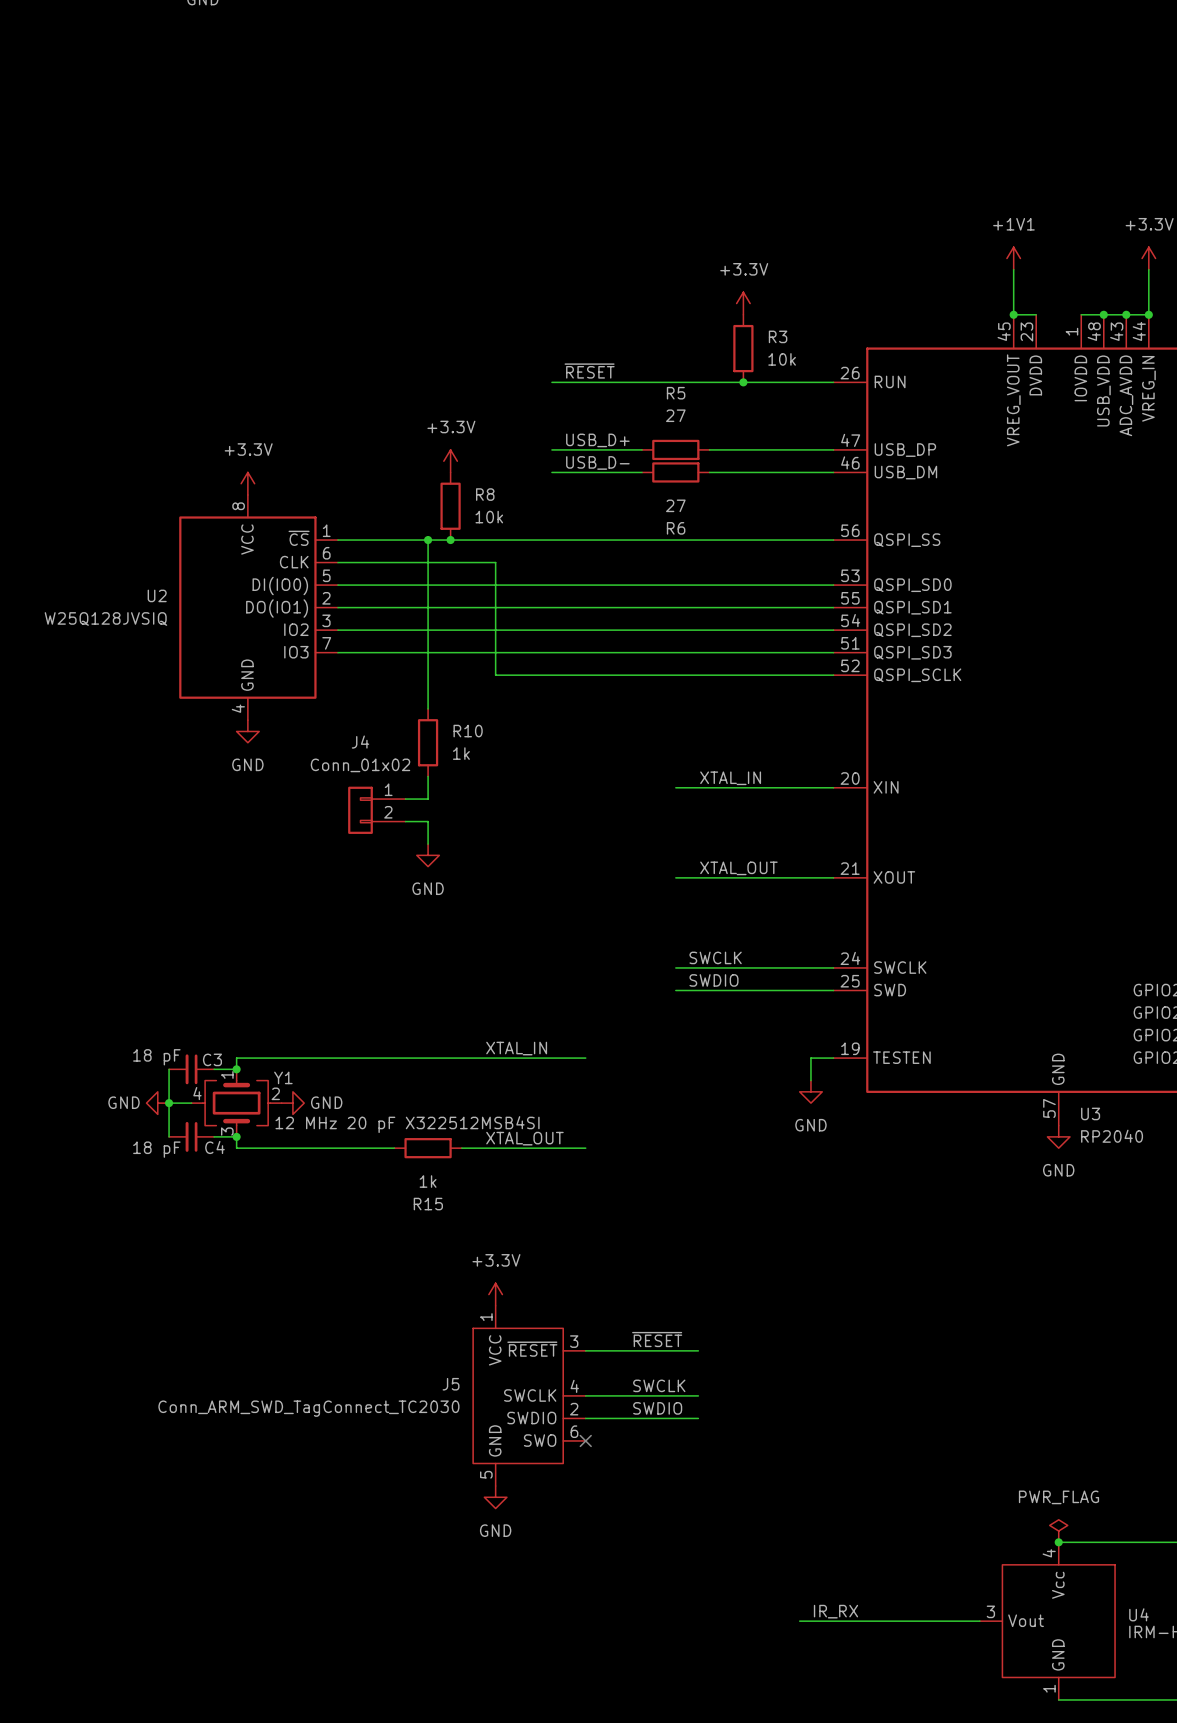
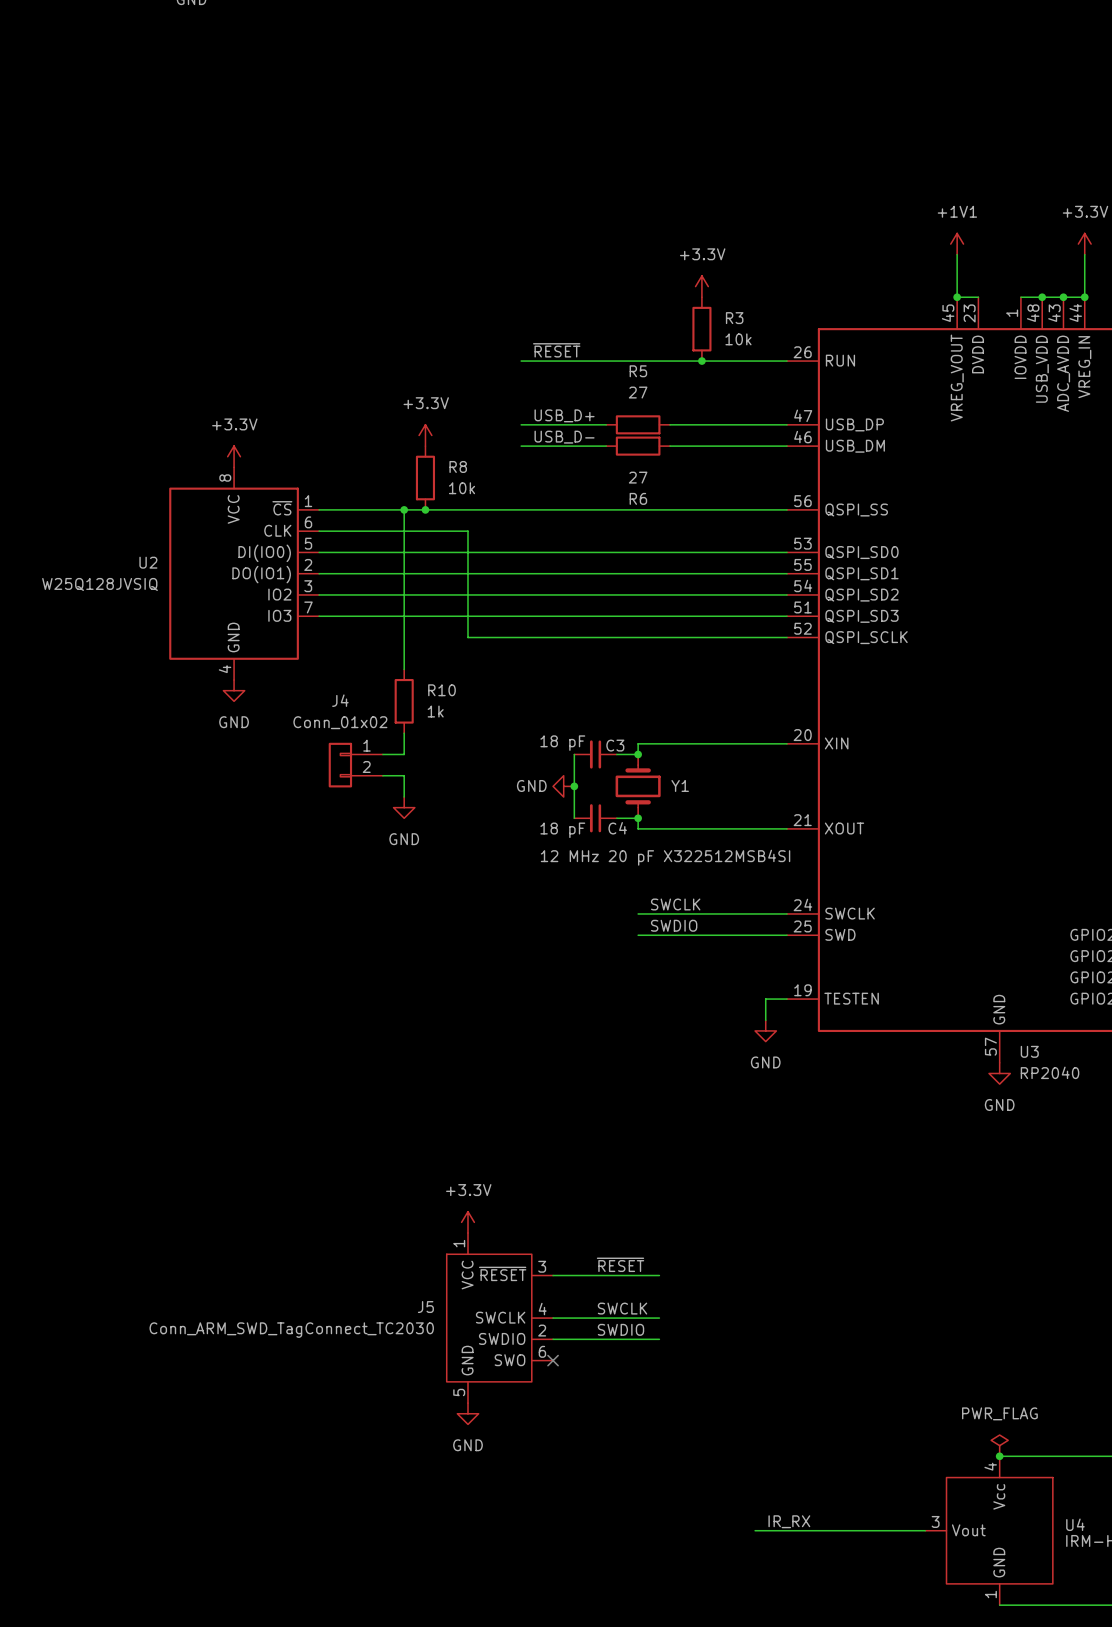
label: XTAL_IN (730, 778) -> none
wire: none -> (638, 743) (638, 754) (616, 754)
wire: none -> (574, 754) (574, 818)
junction: none -> (638, 754)
power symbol: none -> GND (563, 786)
junction: none -> (574, 786)
wire: none -> (616, 818) (638, 818) (638, 828)
junction: none -> (638, 818)
label: XTAL_OUT (738, 868) -> none
label: XTAL_IN (516, 1048) -> none
wire: (585, 1058) (236, 1058) (236, 1069) (214, 1069) -> none
wire: (169, 1069) (169, 1136) -> none
Y1 symbol: [191, 1069, 282, 1137] -> [615, 754, 661, 819]
C3 position: (191, 1069) -> (595, 754)
junction: (236, 1069) -> none
Y1 name position: Y1 (283, 1077) -> Y1 (680, 785)
power symbol: GND (157, 1103) -> none
wire: (169, 1103) (191, 1103) -> none
junction: (169, 1103) -> none
power symbol: GND (292, 1103) -> none
Y1 value position: 12 MHz 20 pF X322512MSB4SI (407, 1124) -> 12 MHz 20 pF X322512MSB4SI (665, 857)
C4 position: (191, 1136) -> (595, 818)
wire: (214, 1136) (236, 1136) (236, 1148) (394, 1148) -> none
junction: (236, 1136) -> none
label: XTAL_OUT (524, 1138) -> none
R15: 1k (428, 1148) -> none
wire: (461, 1148) (585, 1148) -> none

